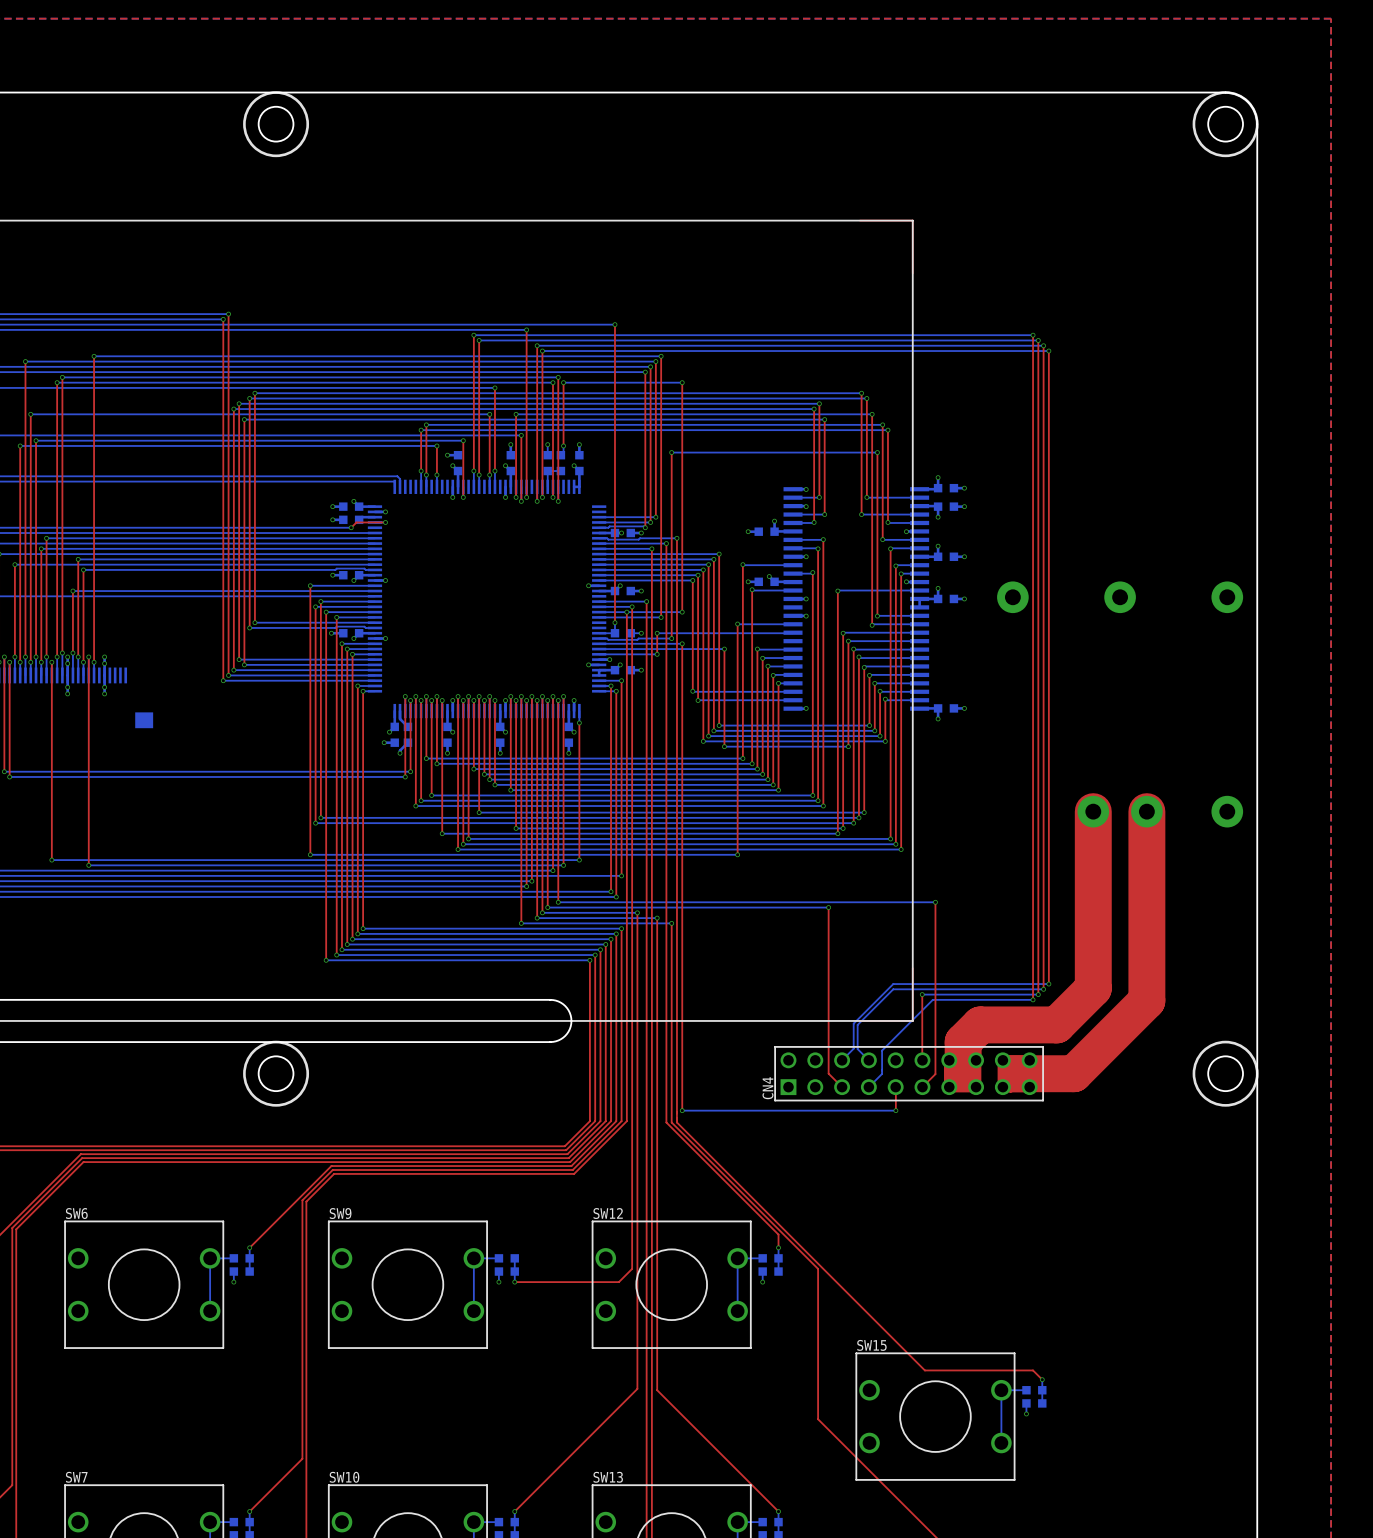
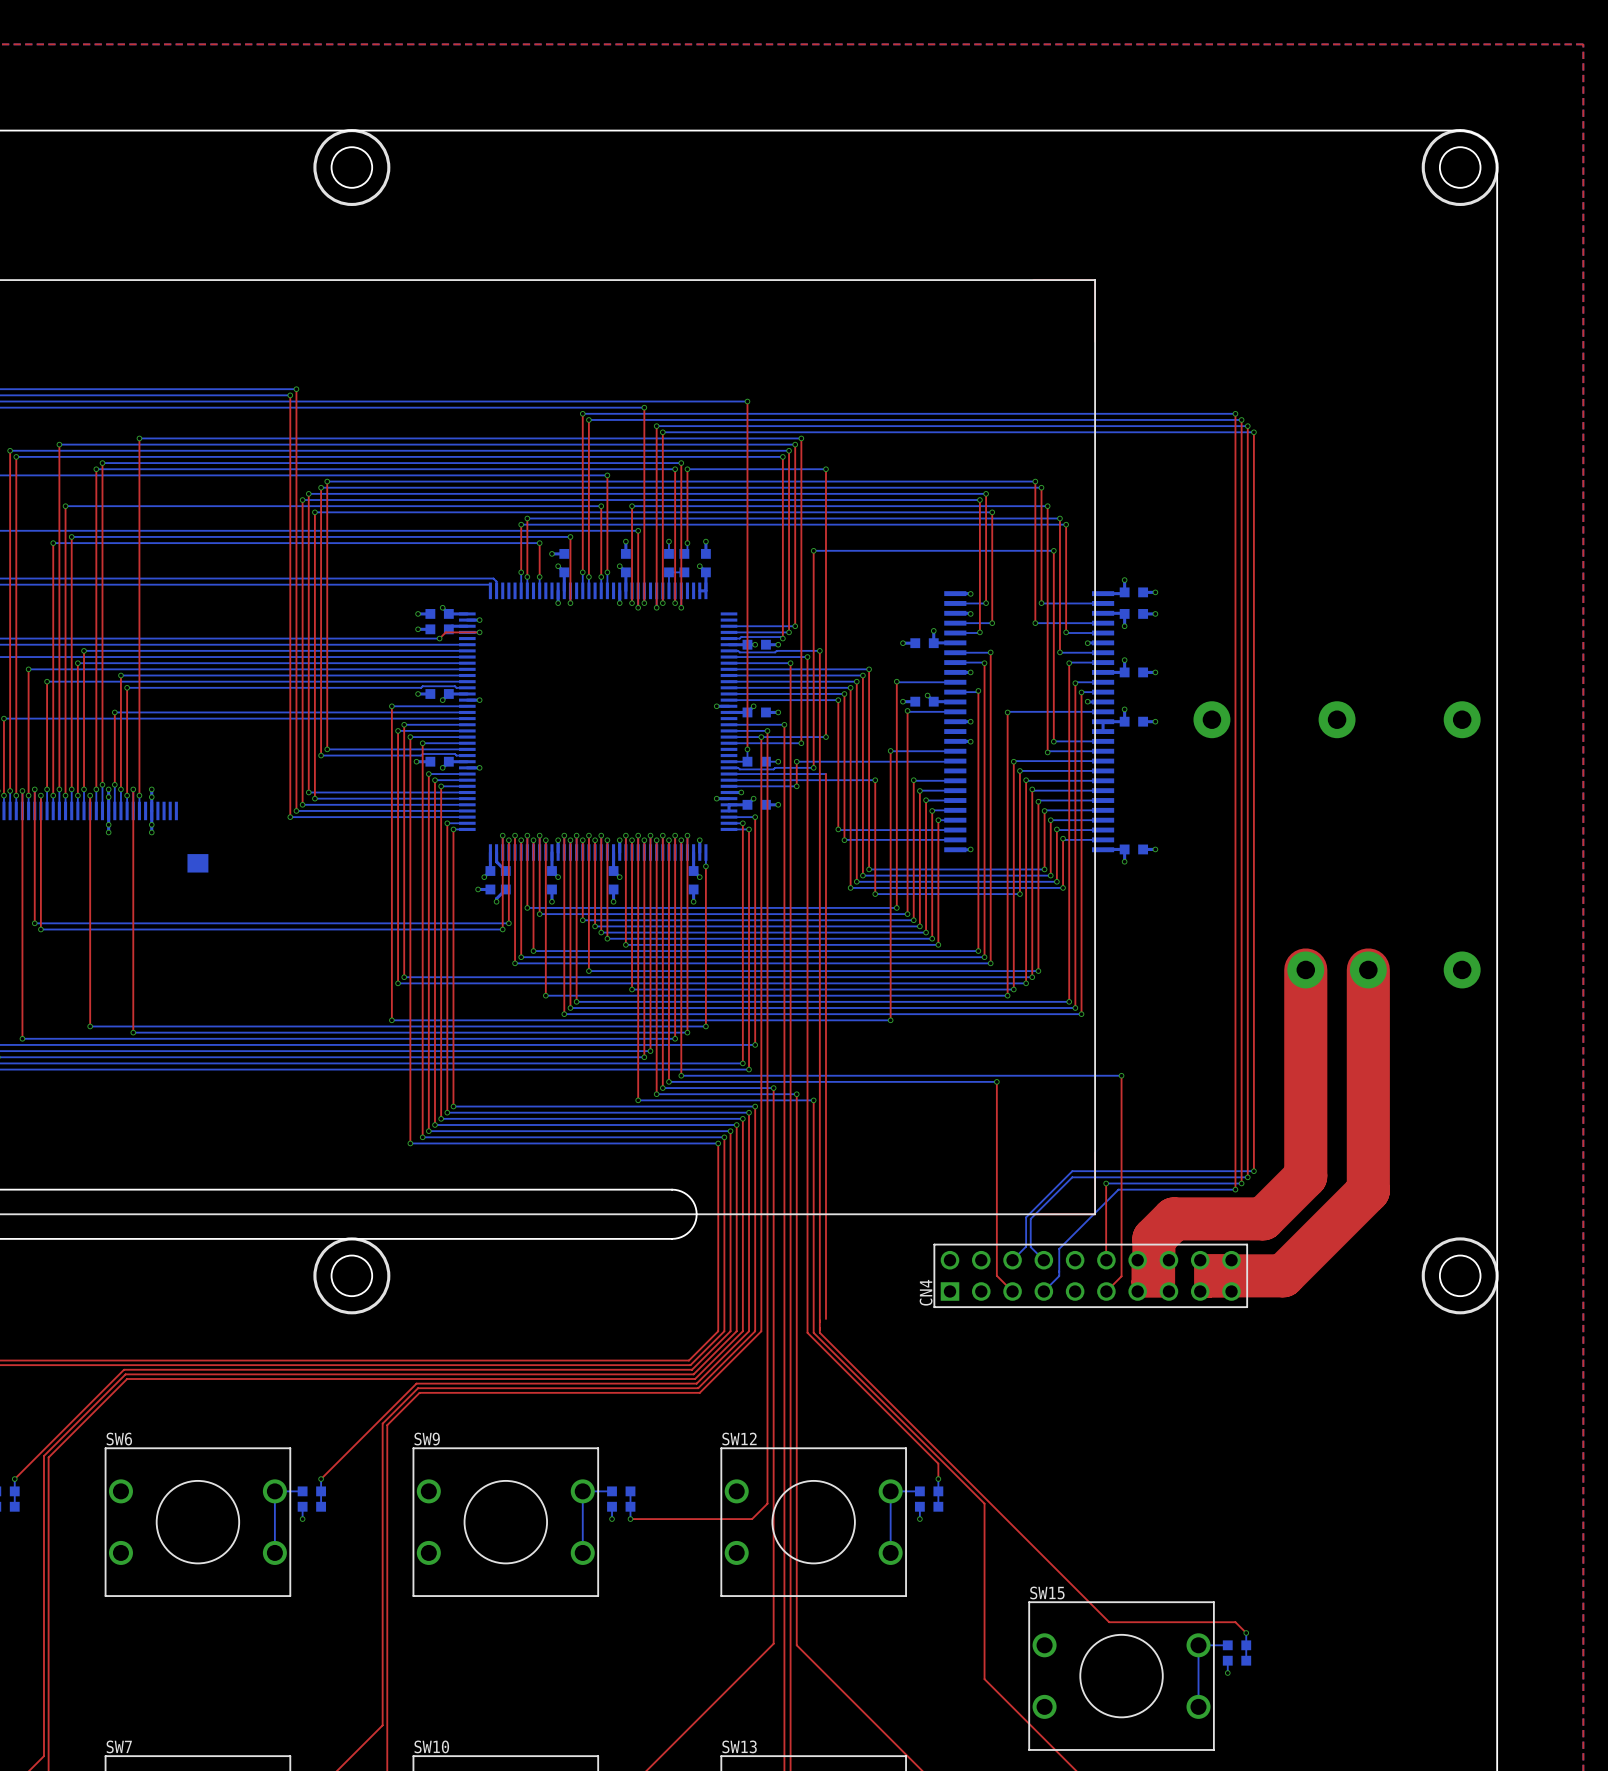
via: (682, 643) -> none
top track: (895, 1087) (895, 1110) -> none
bottom track: (682, 1110) (895, 1110) -> none
via: (682, 1110) -> none
via: (895, 1110) -> none

